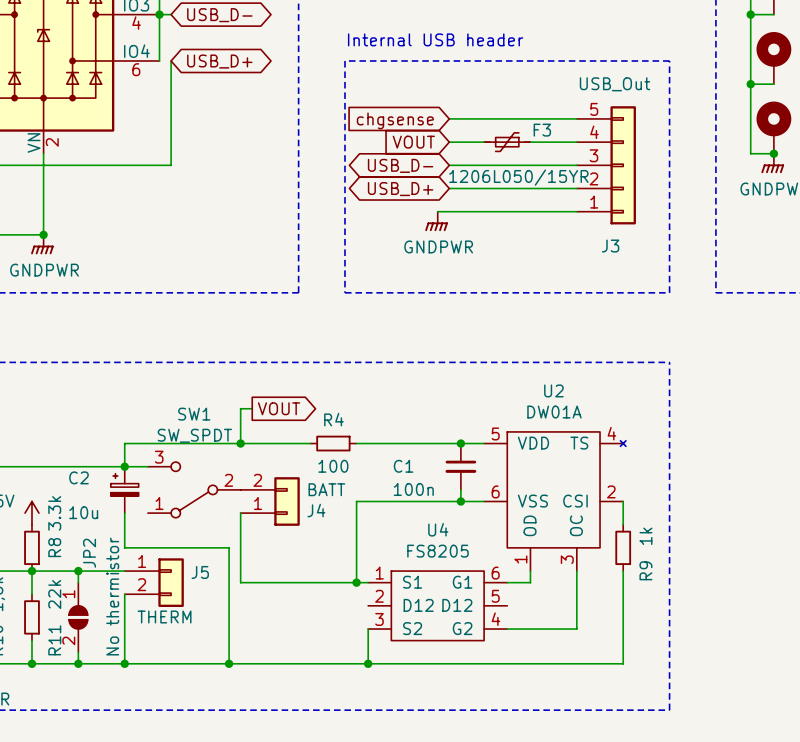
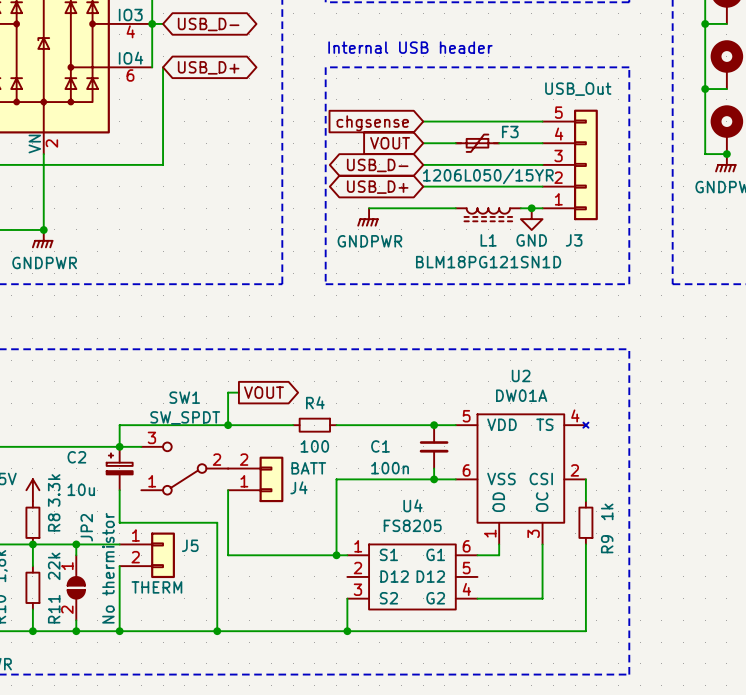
wire: none -> (369, 208) (412, 208)
wire: (484, 211) (553, 211) -> none
junction: none -> (531, 208)
L1: none -> BLM18PG121SN1D (488, 214)
power symbol position: GNDPWR (436, 221) -> GNDPWR (367, 217)
power symbol: none -> GND (531, 219)

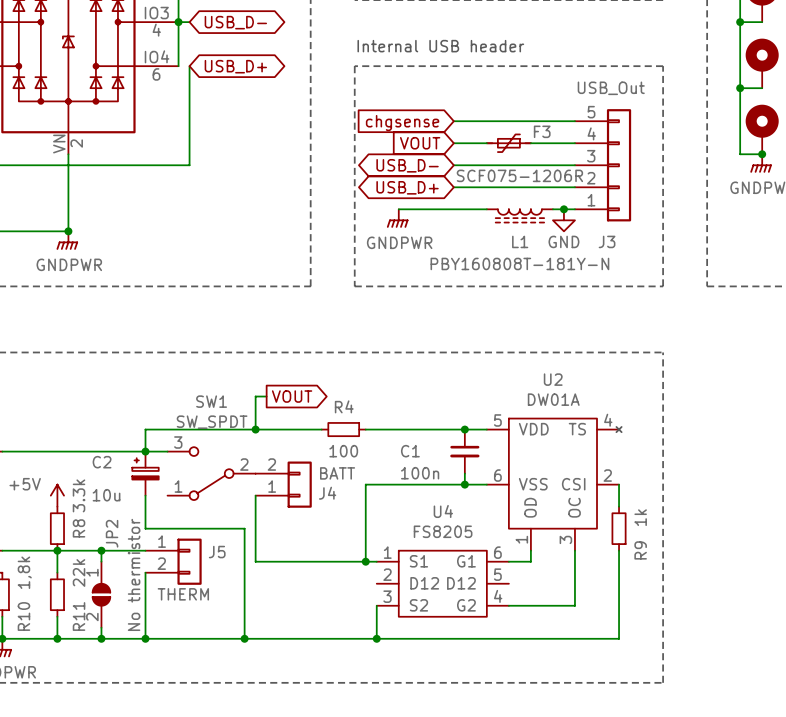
F3 value: 1206L050/15YR (488, 176) -> SCF075-1206R (519, 175)
L1 value: BLM18PG121SN1D (488, 262) -> PBY160808T-181Y-N (519, 263)

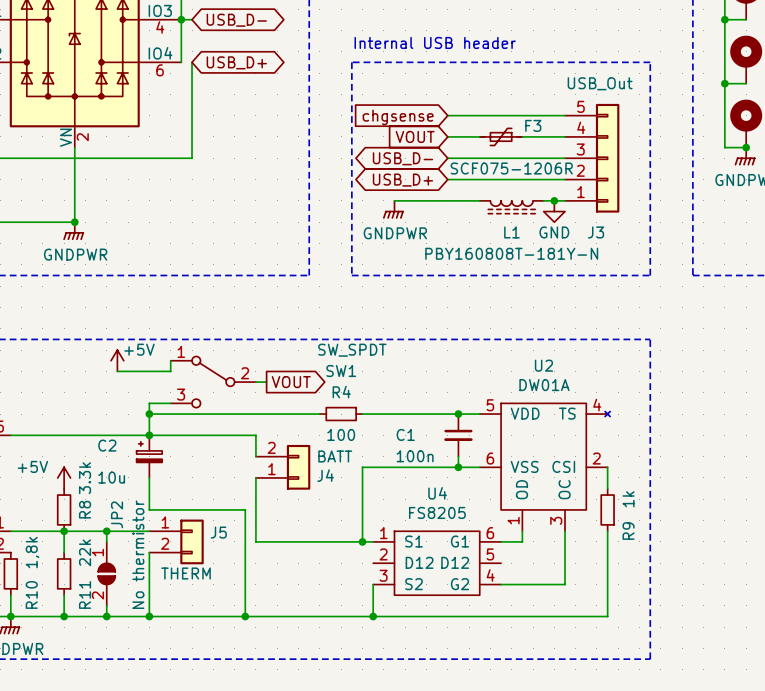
power symbol: none -> +5V (117, 360)
wire: none -> (170, 360) (170, 371) (117, 371)
wire: (255, 396) (255, 429) -> none
SW1 name position: SW1 (211, 401) -> SW1 (341, 371)
wire: none -> (170, 403) (149, 403) (149, 414)
SW1 value position: SW_SPDT (212, 422) -> SW_SPDT (352, 350)
junction: none -> (149, 414)
junction: (255, 429) -> none
wire: none -> (170, 435) (255, 435) (255, 456)
SW1 flip: as is (211, 473) -> up-down (213, 382)
SW1 position: (211, 473) -> (213, 382)

